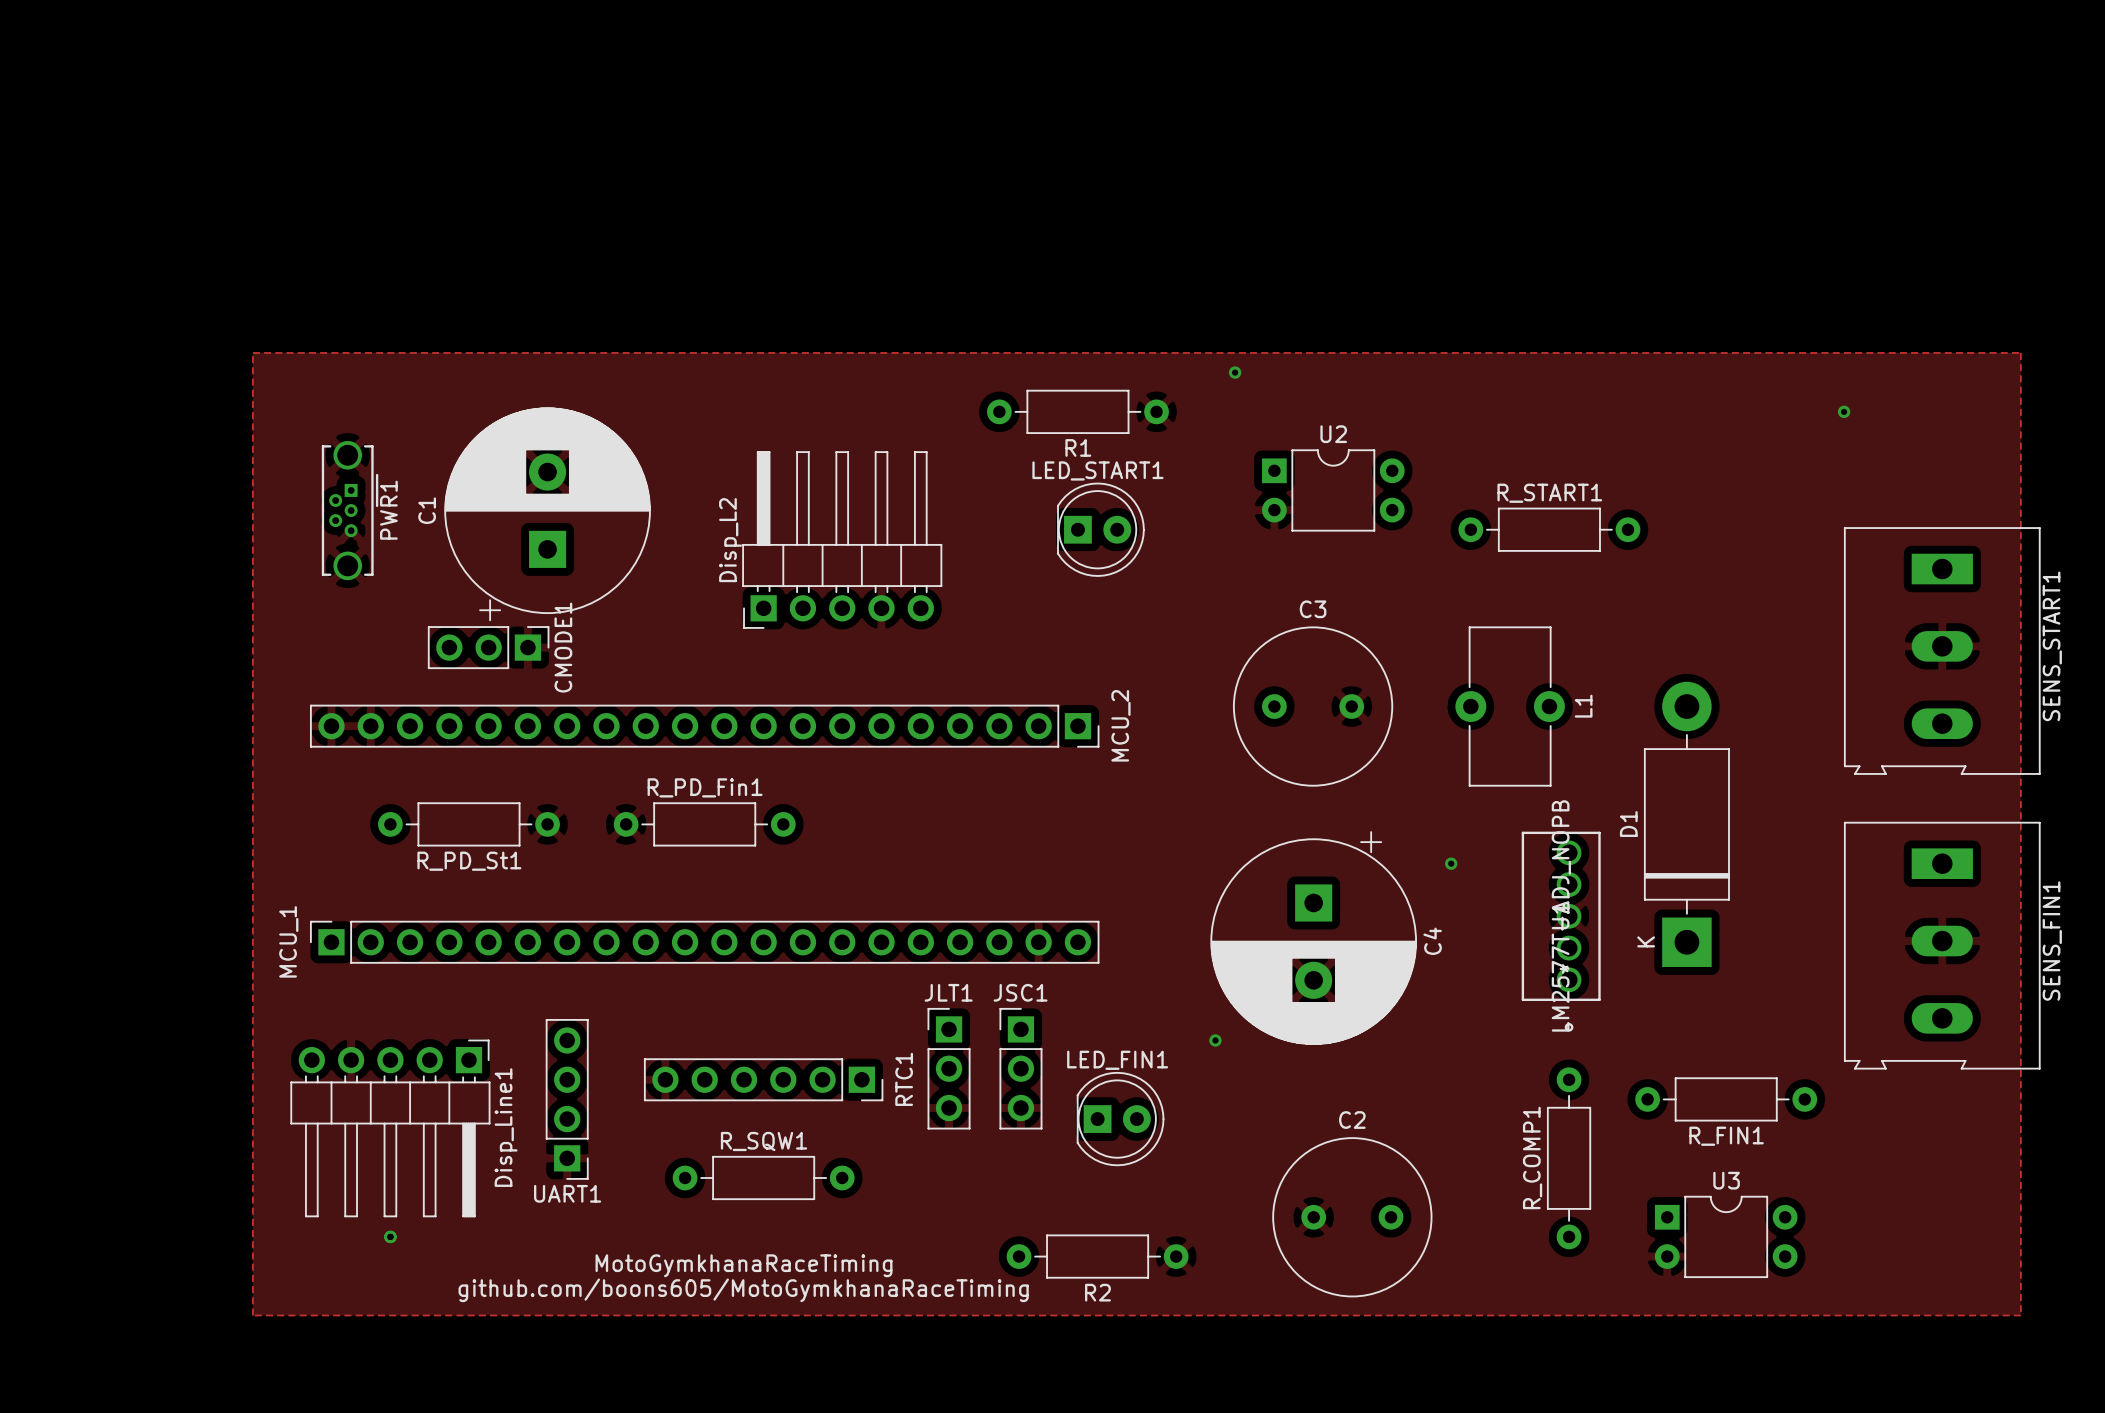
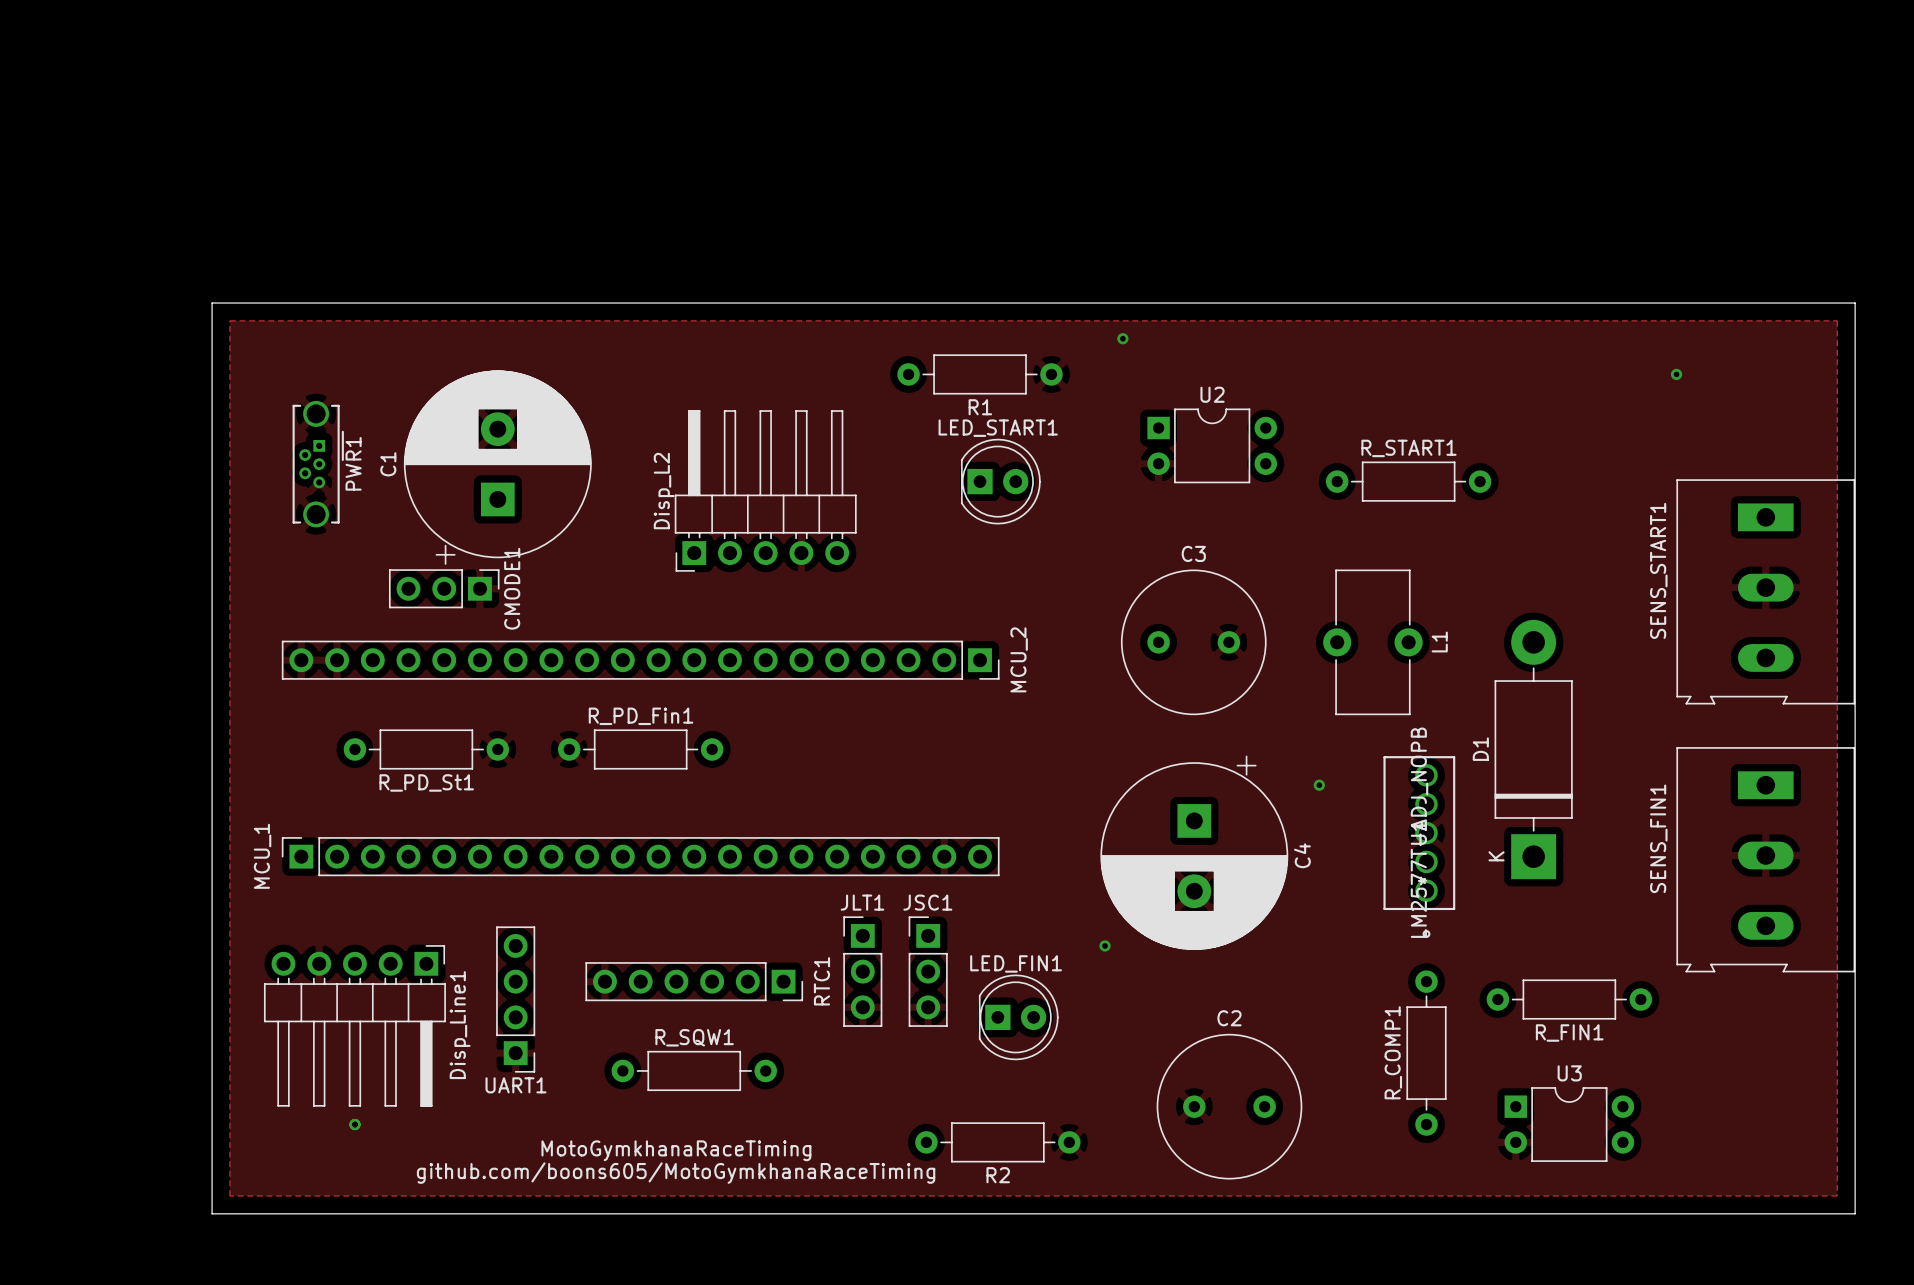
board edge: none -> (212, 303) (212, 1213) (1855, 1213) (1855, 303) (212, 303)
SENS_START1 name position: SENS_START1 (2052, 646) -> SENS_START1 (1658, 570)
SENS_FIN1 name position: SENS_FIN1 (2052, 941) -> SENS_FIN1 (1658, 838)

